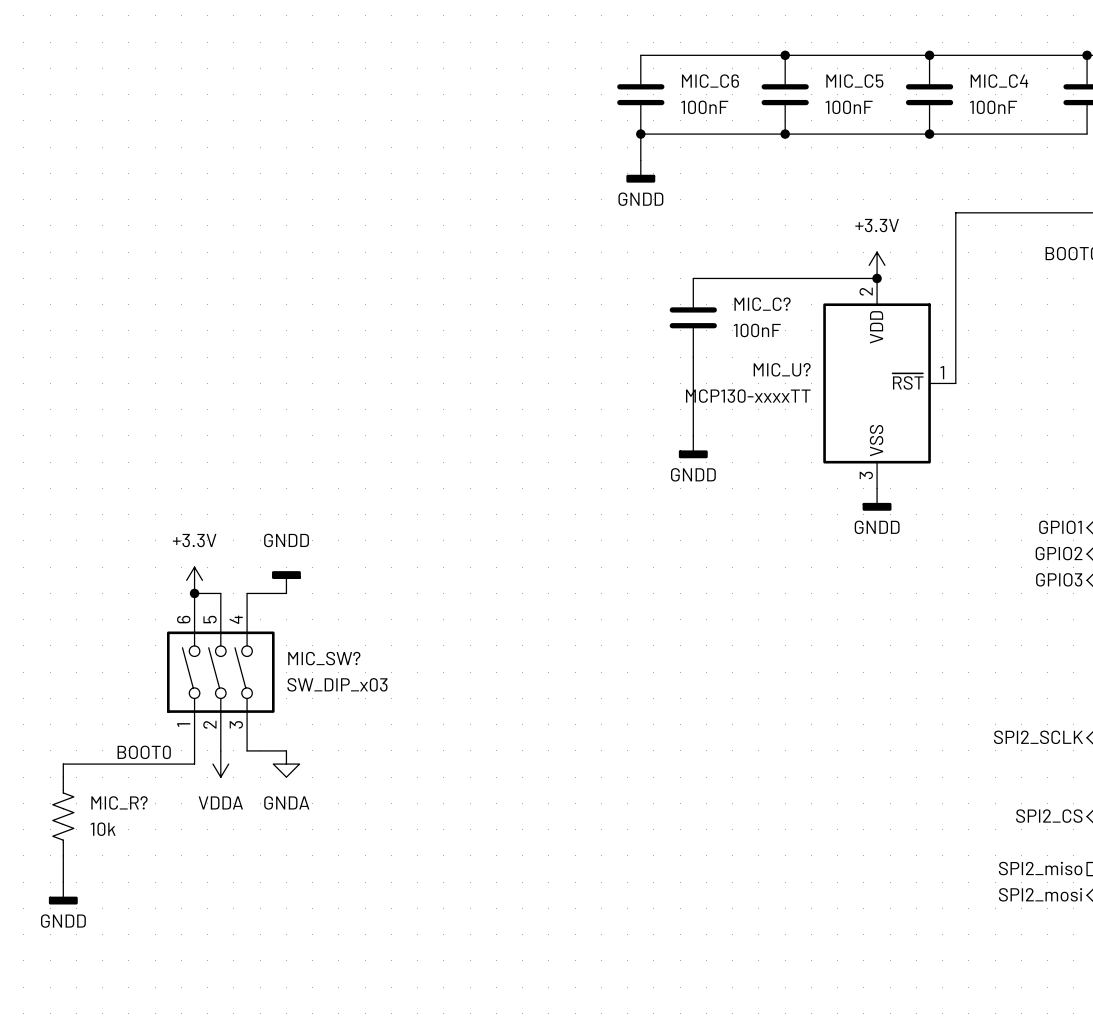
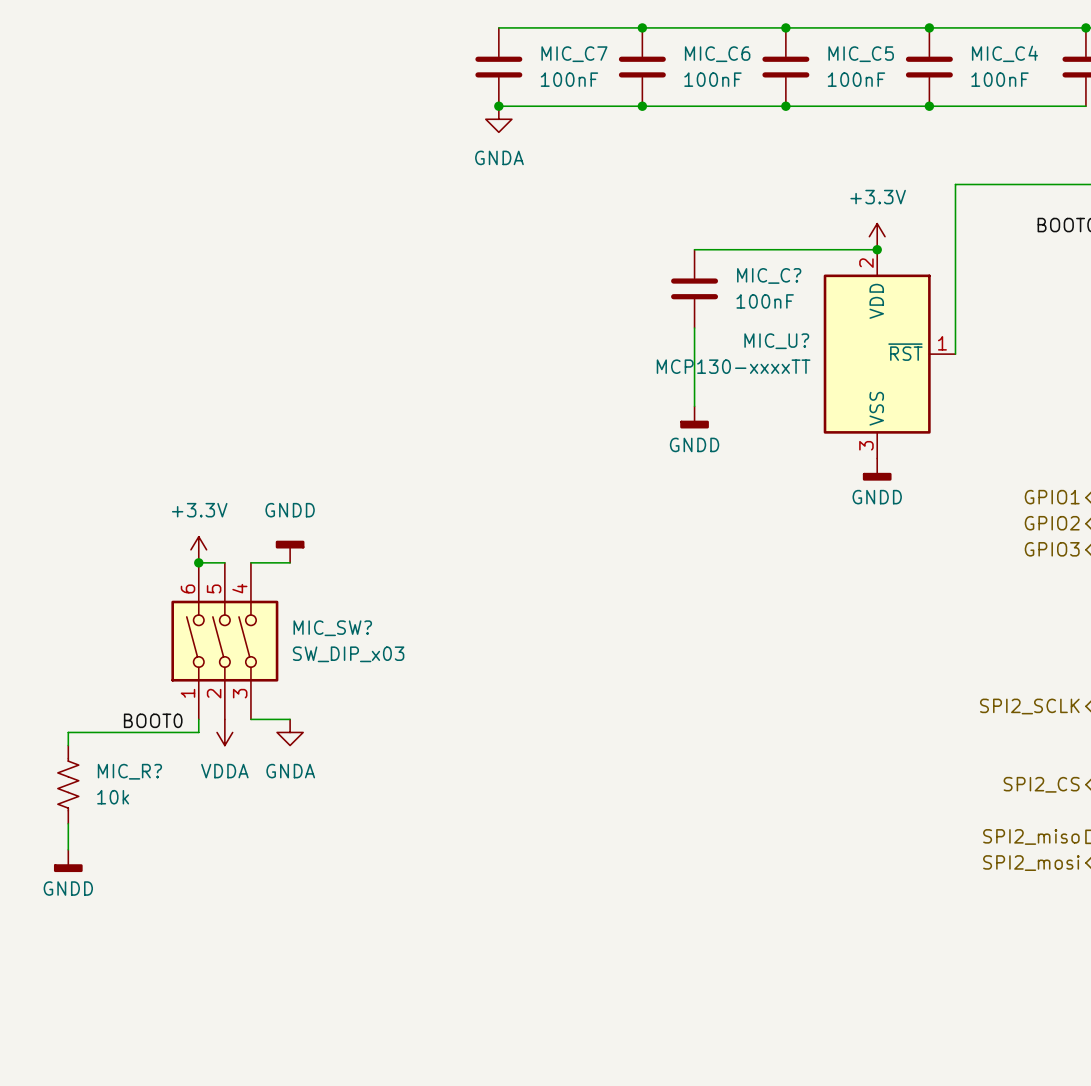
wire: none -> (498, 27) (642, 27)
junction: none -> (642, 27)
MIC_C7: none -> 100nF (498, 67)
junction: none -> (498, 106)
wire: (640, 134) (640, 160) -> (642, 106) (498, 106)
power symbol: none -> GNDA (498, 119)
power symbol: GNDD (640, 171) -> none

